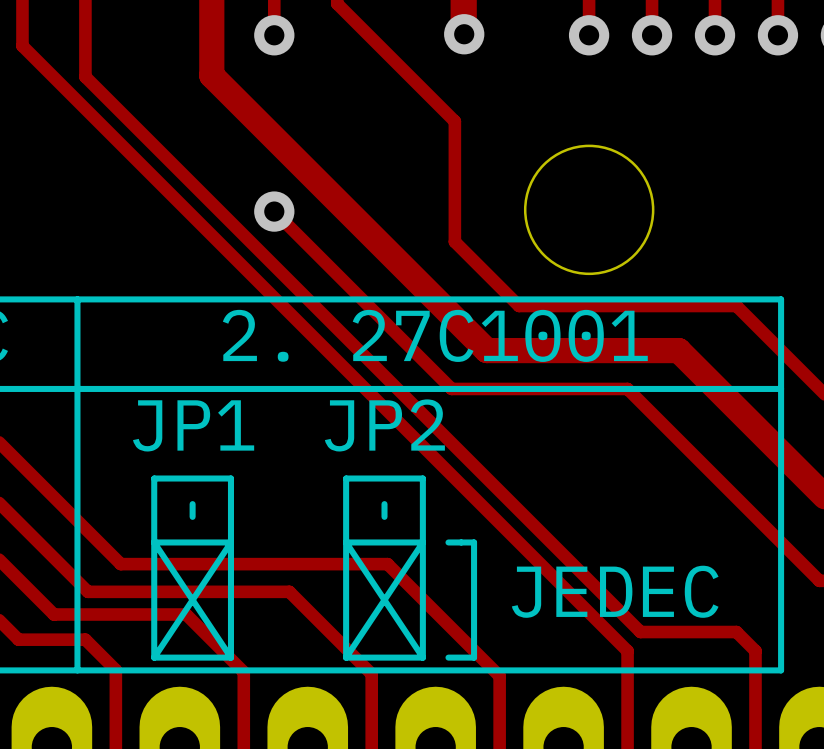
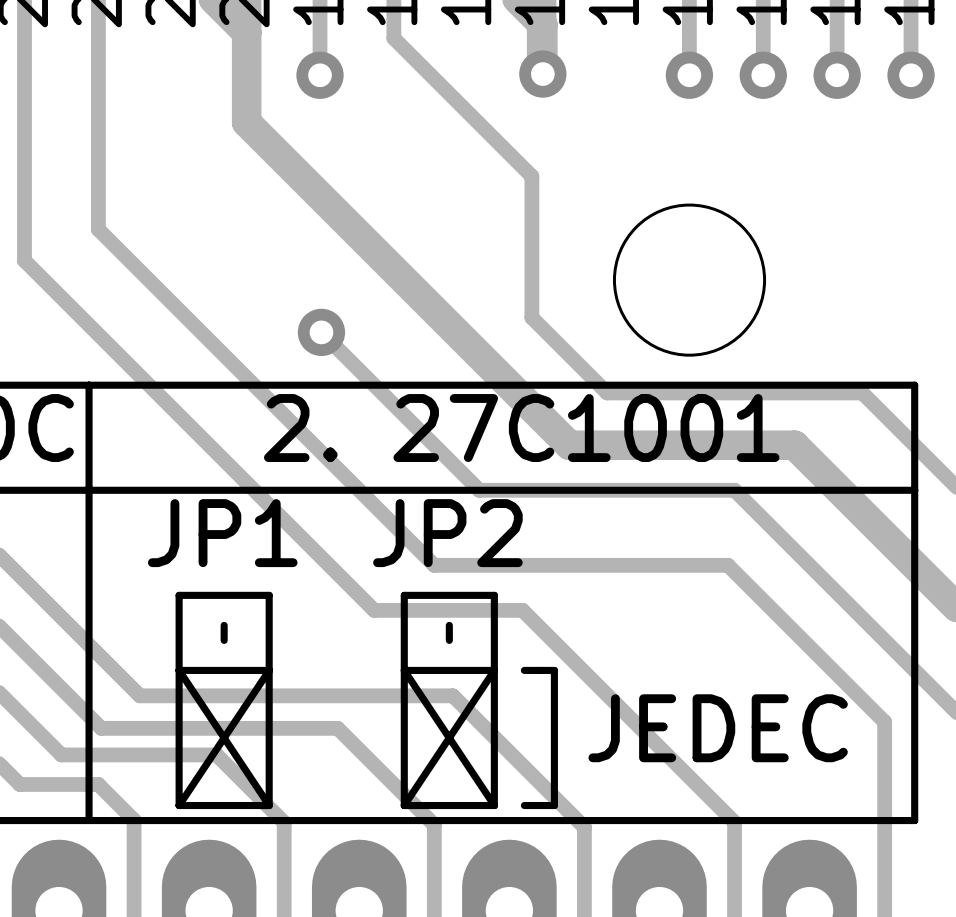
track: (22, 45) (627, 651) (627, 671) -> (24, 87) (24, 260) (374, 610) (522, 610) (734, 822)
track: (85, 76) (640, 632) (736, 632) (755, 651) -> (98, 124) (98, 229) (434, 565) (727, 565) (884, 722) (884, 797)
track: (274, 211) (451, 388) -> (321, 332) (479, 490) (528, 490)
via position: (274, 211) -> (321, 332)

